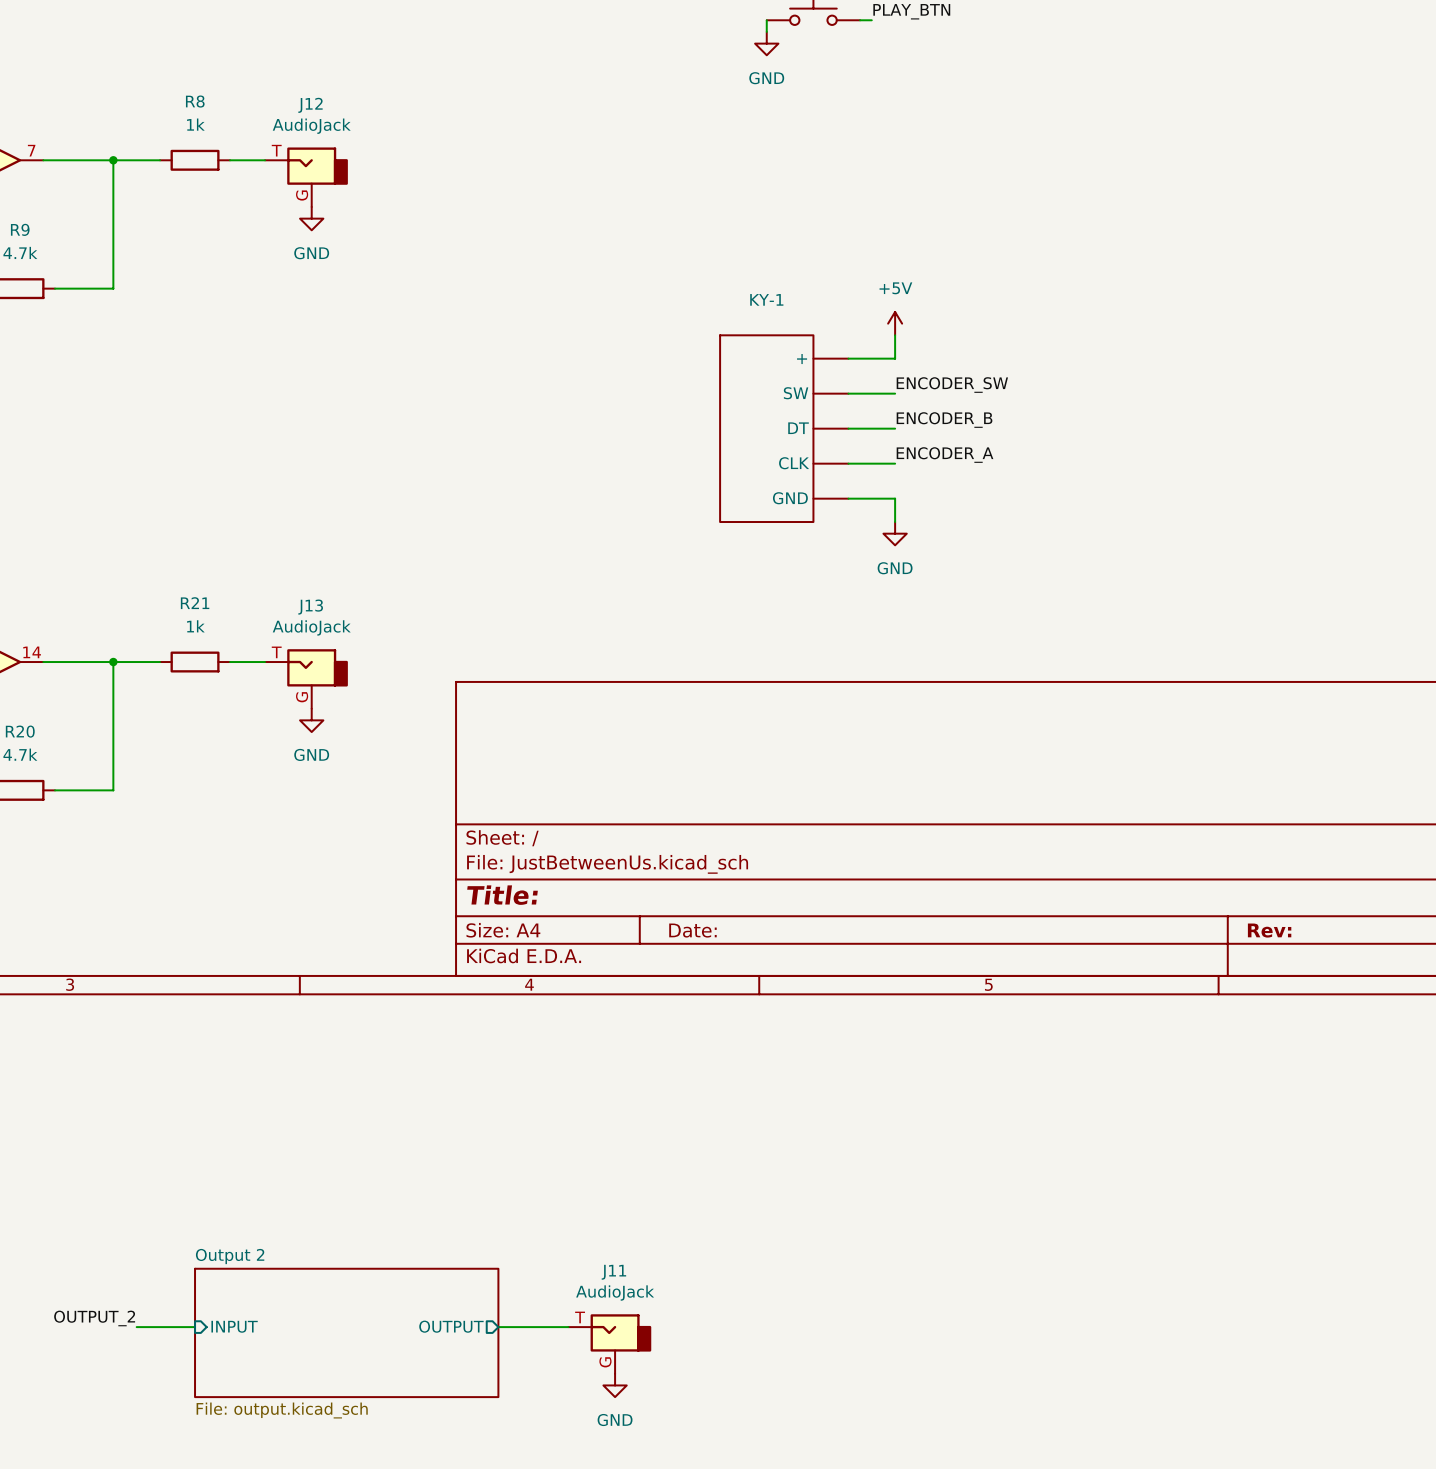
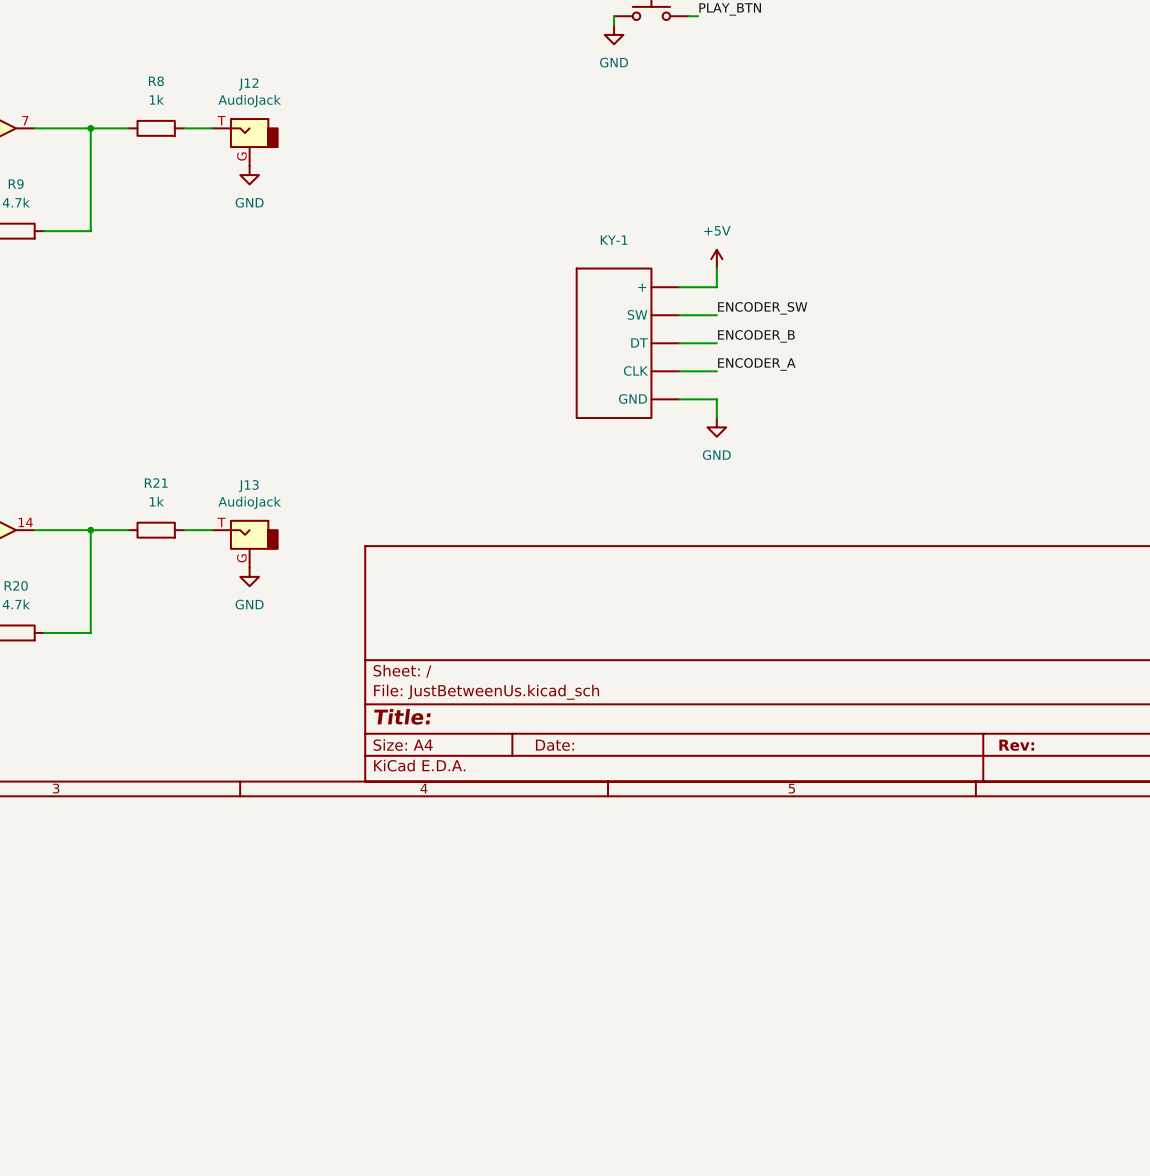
label: OUTPUT_2 (94, 1318) -> none
sheet pin: INPUT (234, 1326) -> none
sheet pin: OUTPUT (451, 1326) -> none
wire: (136, 1327) (195, 1327) -> none
wire: (498, 1327) (568, 1327) -> none
sheet Output 2: File: output.kicad_sch (346, 1332) -> none
J11: AudioJack (609, 1344) -> none
power symbol: GND (615, 1385) -> none

